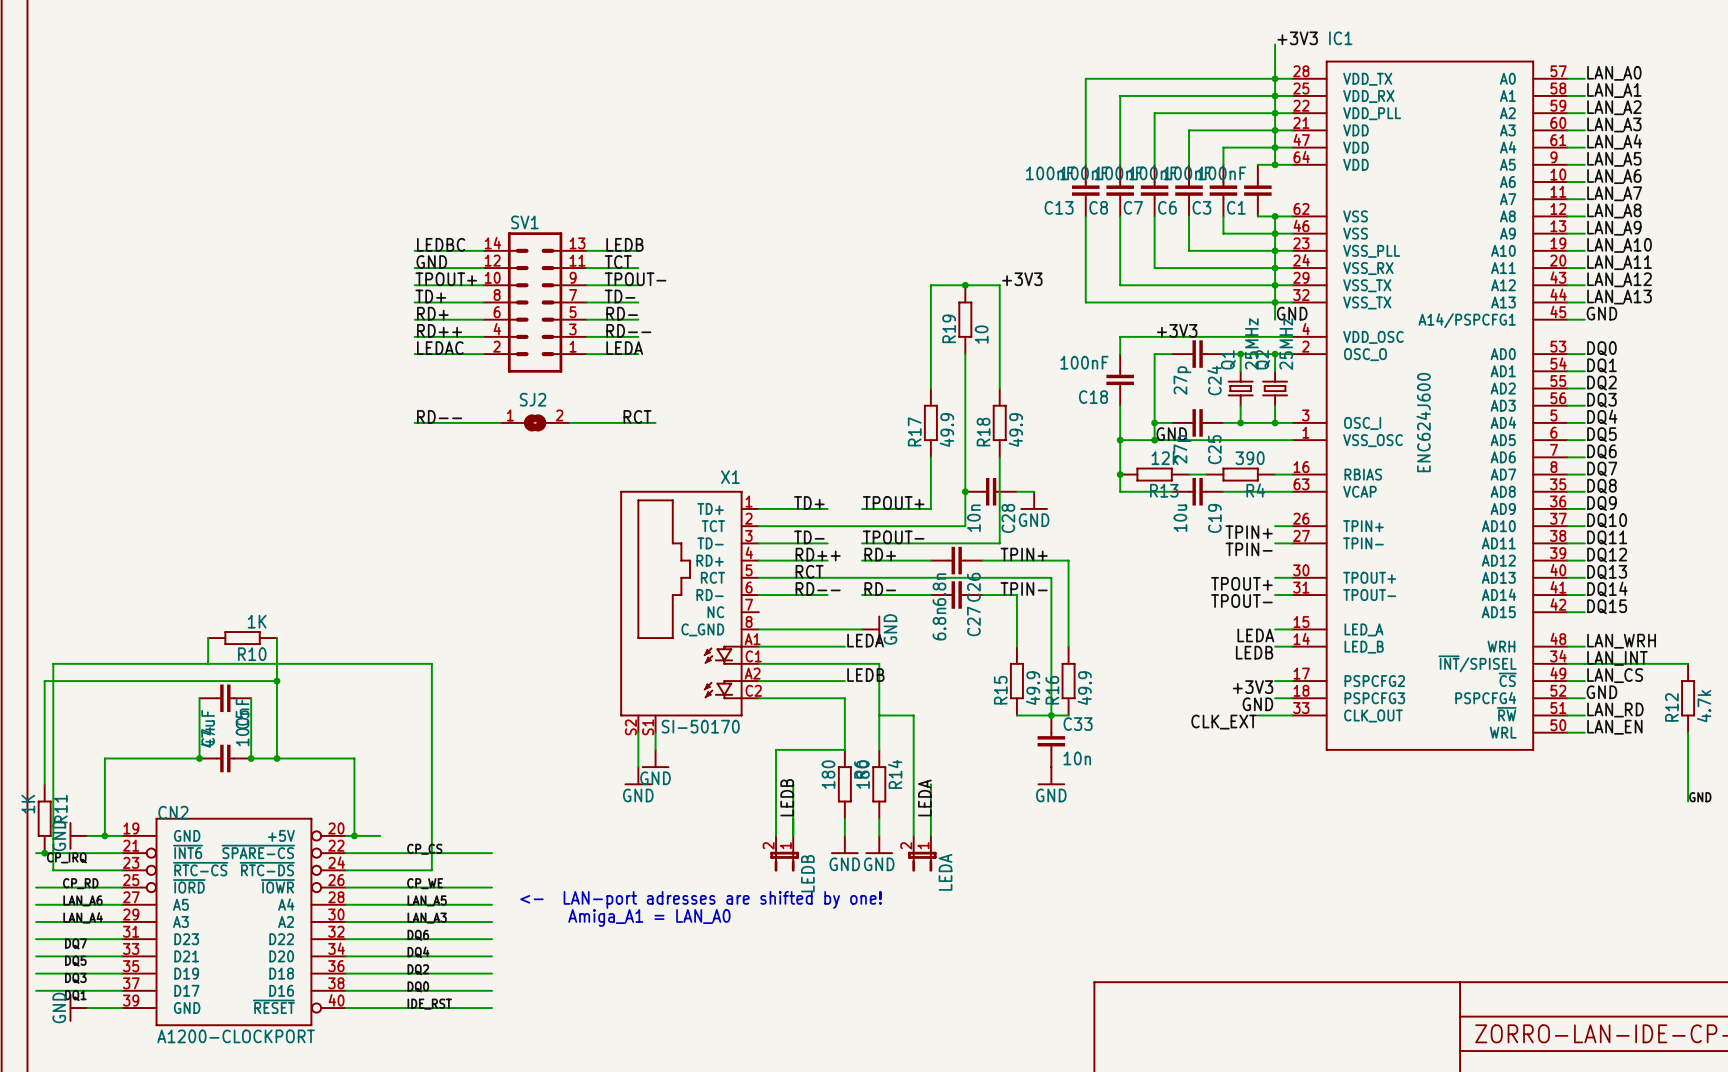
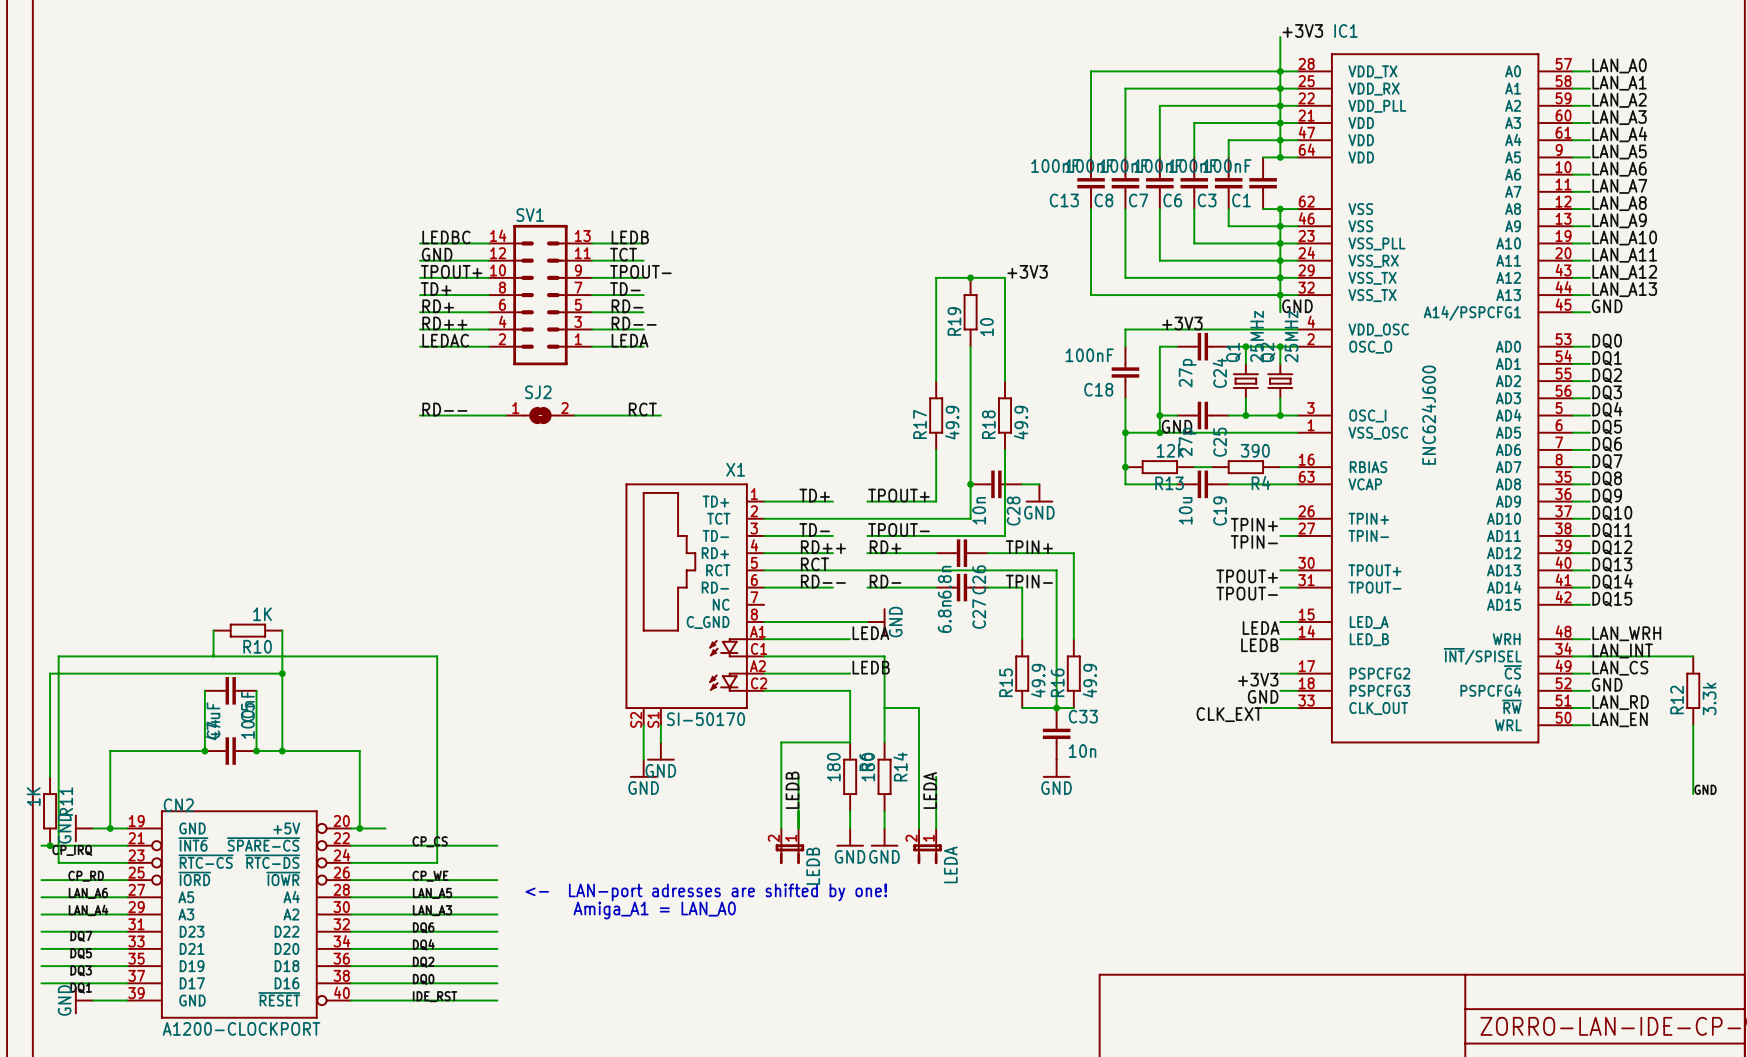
R12 value: 4.7k (1704, 706) -> 3.3k (1709, 698)

